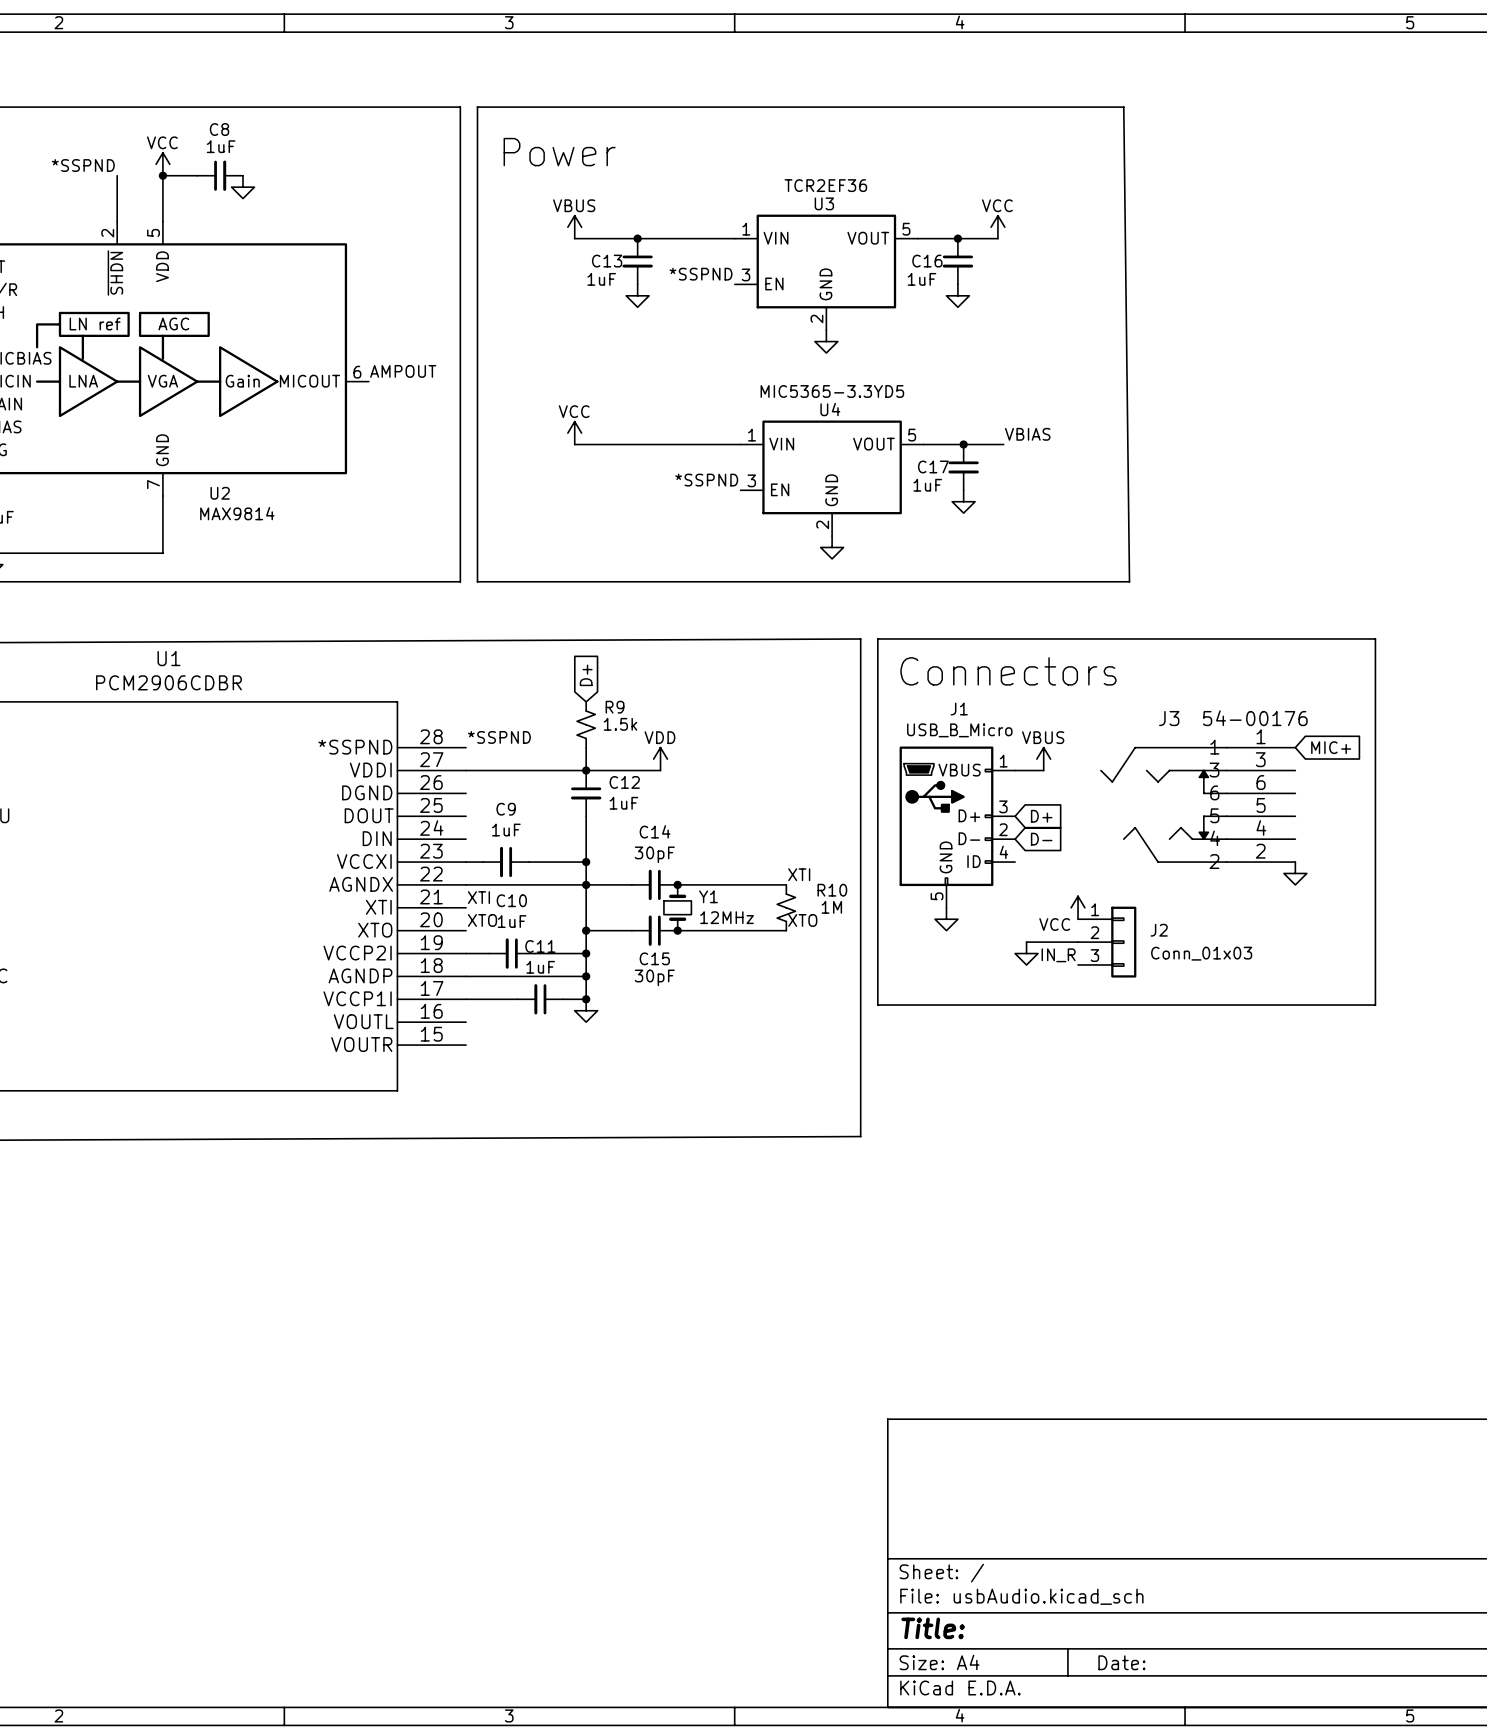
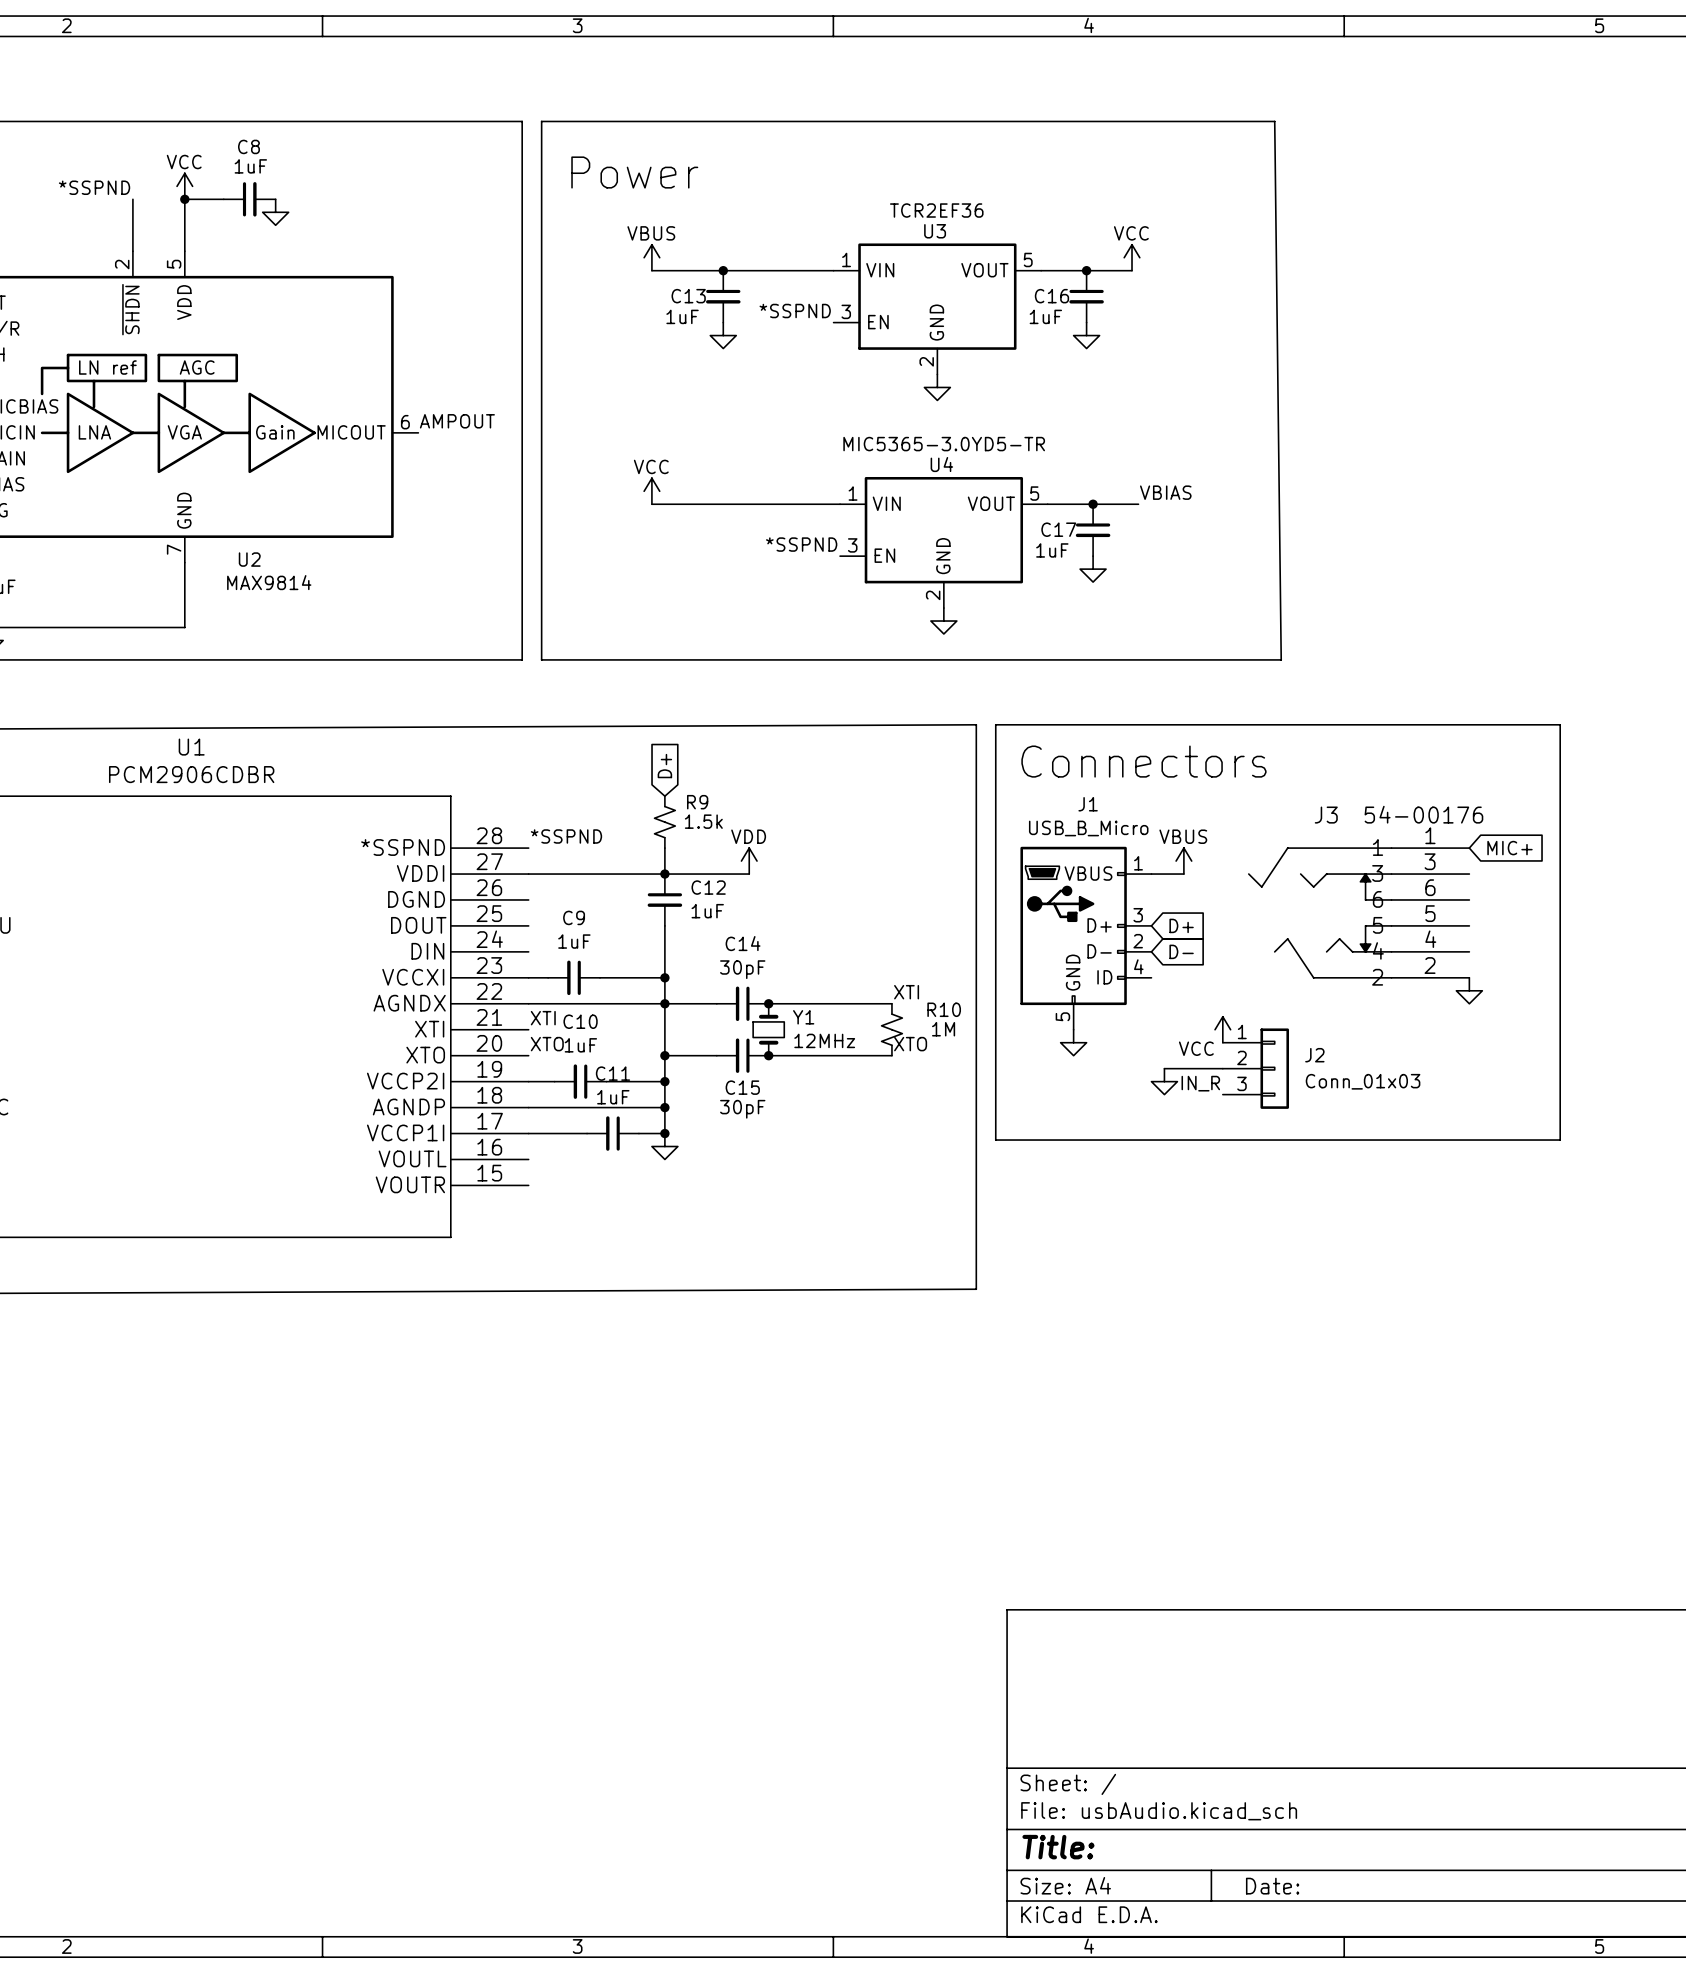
U4 value: MIC5365-3.3YD5 (832, 391) -> MIC5365-3.0YD5-TR (944, 444)

